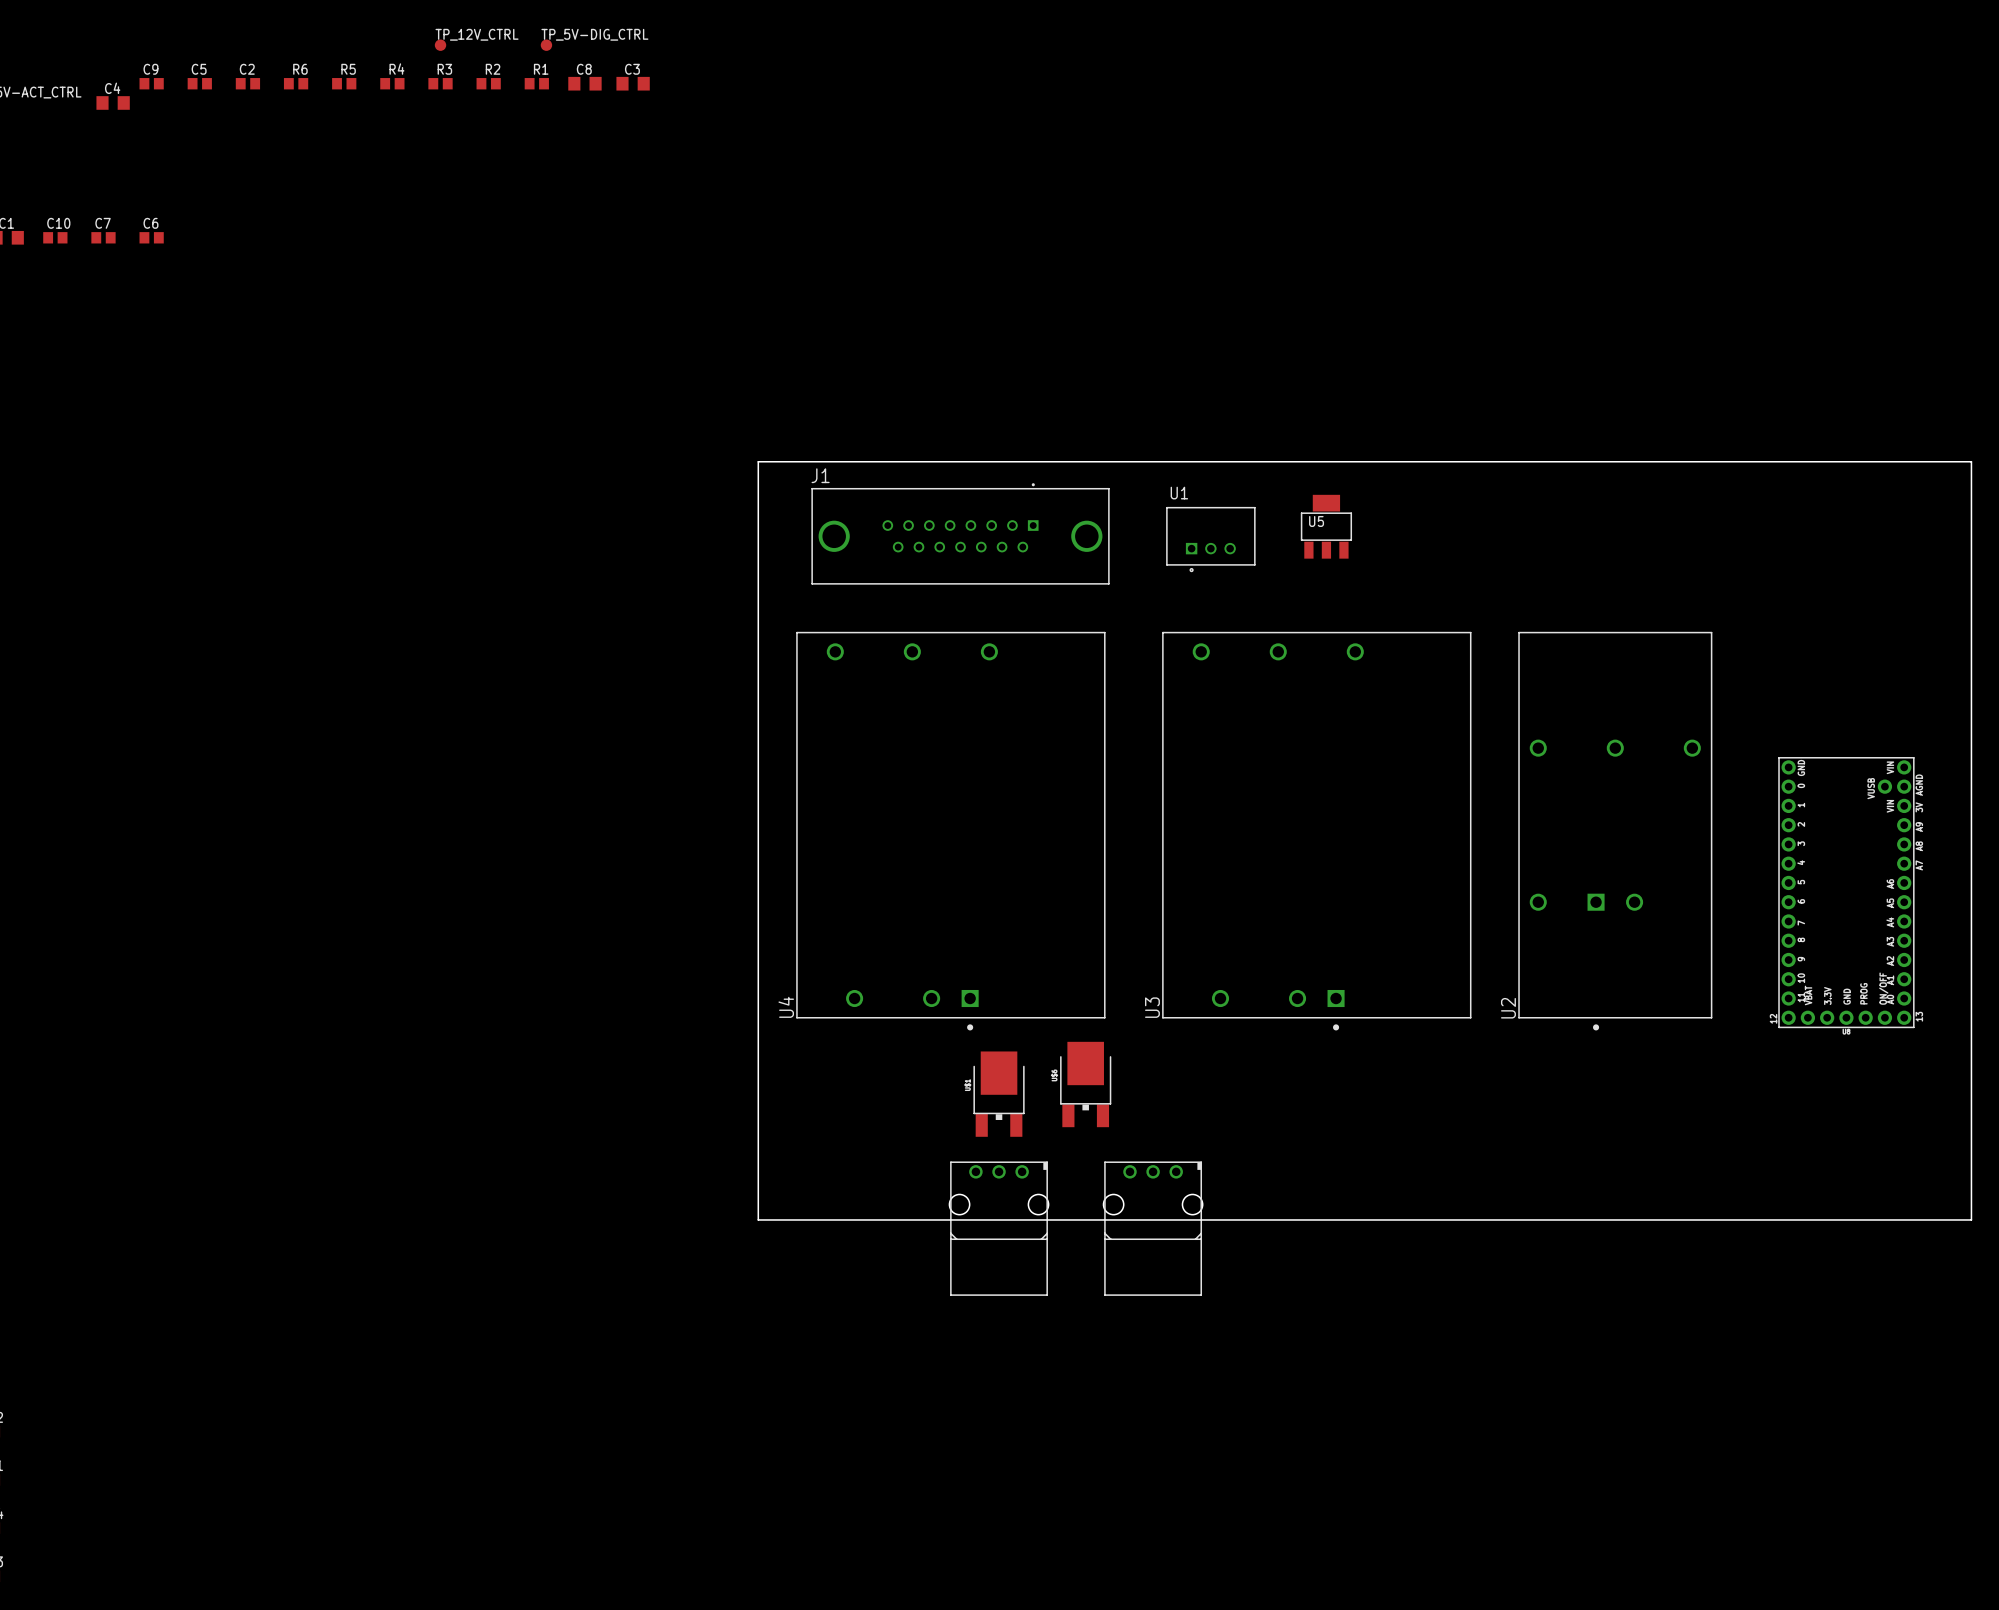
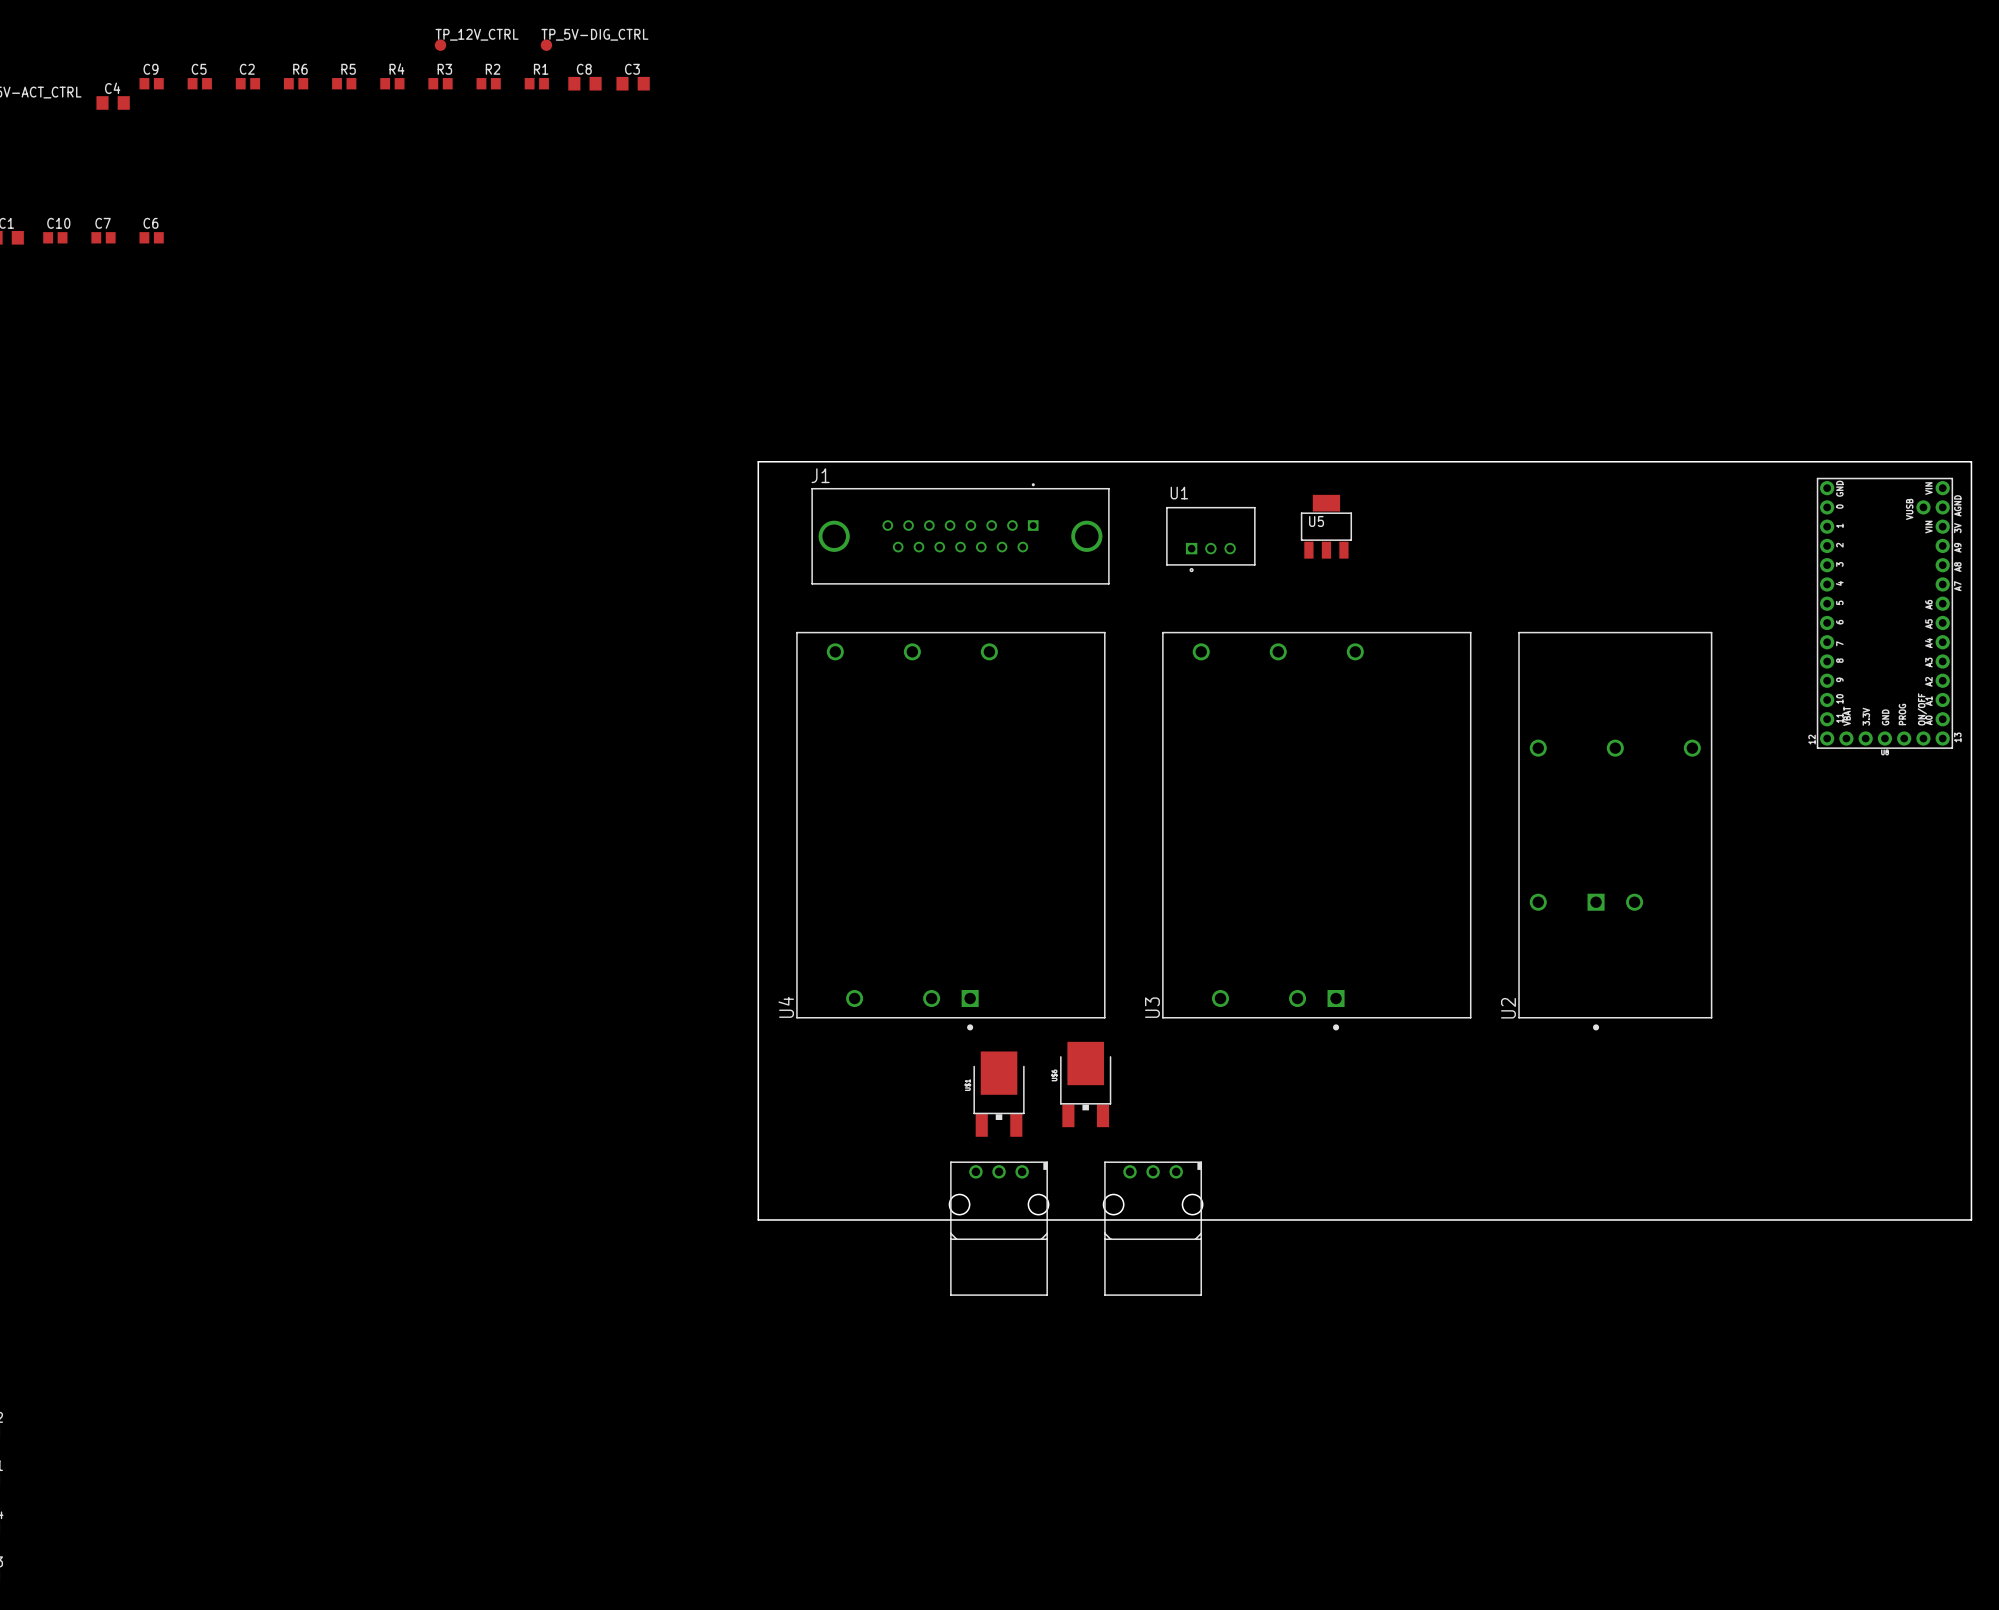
part position: (1846, 892) -> (1884, 613)

